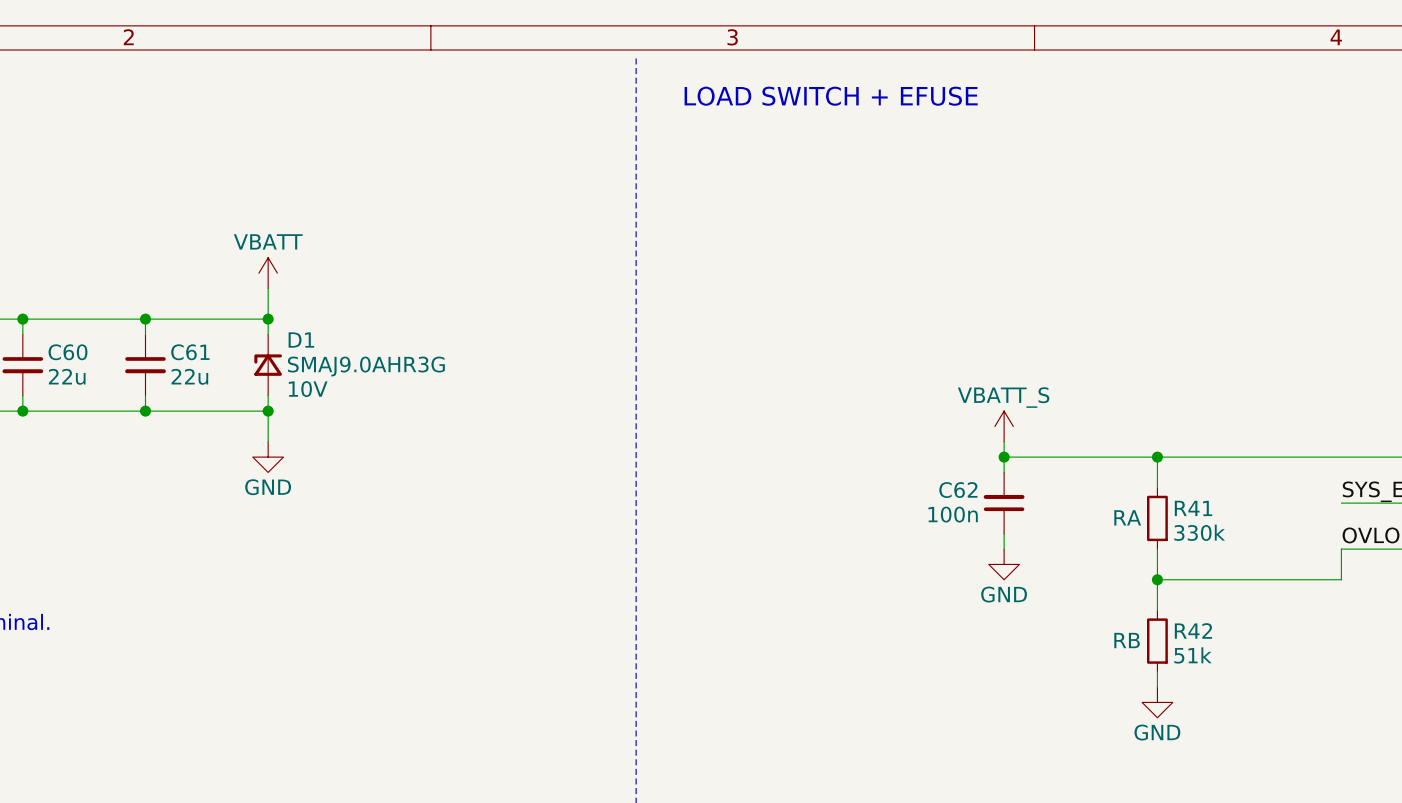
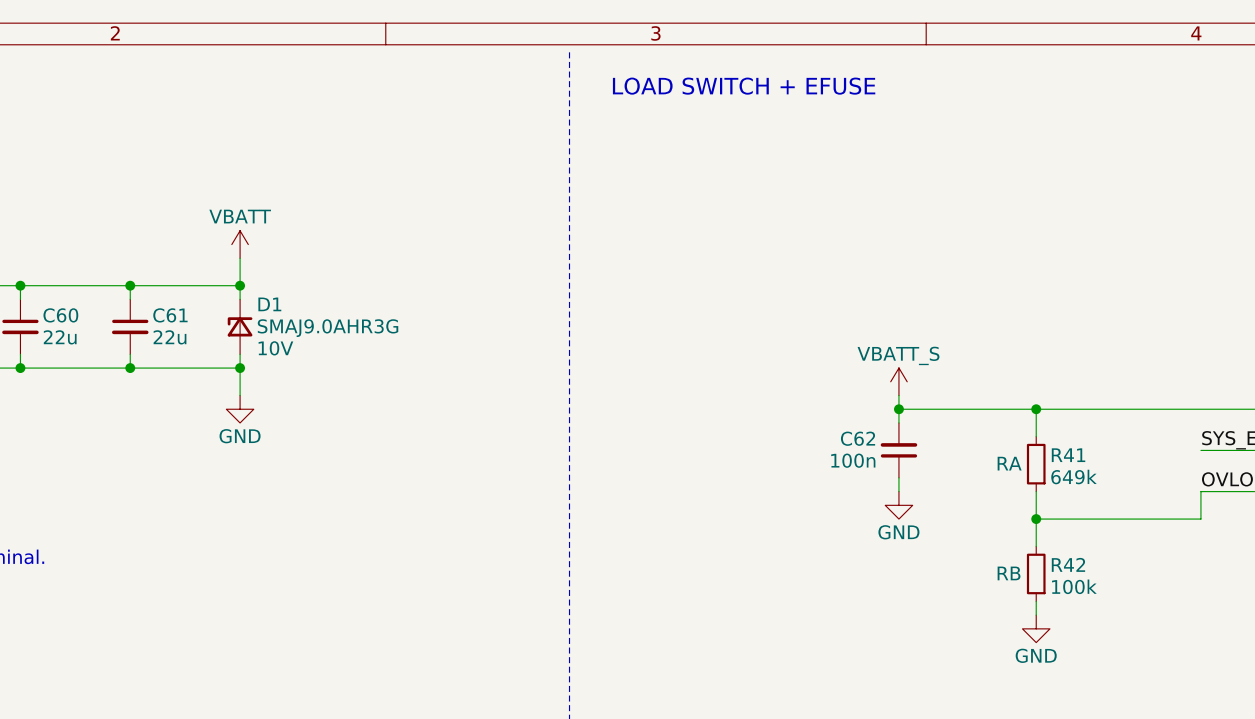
R41 value: 330k (1199, 532) -> 649k (1074, 477)
R42 value: 51k (1193, 655) -> 100k (1074, 586)

